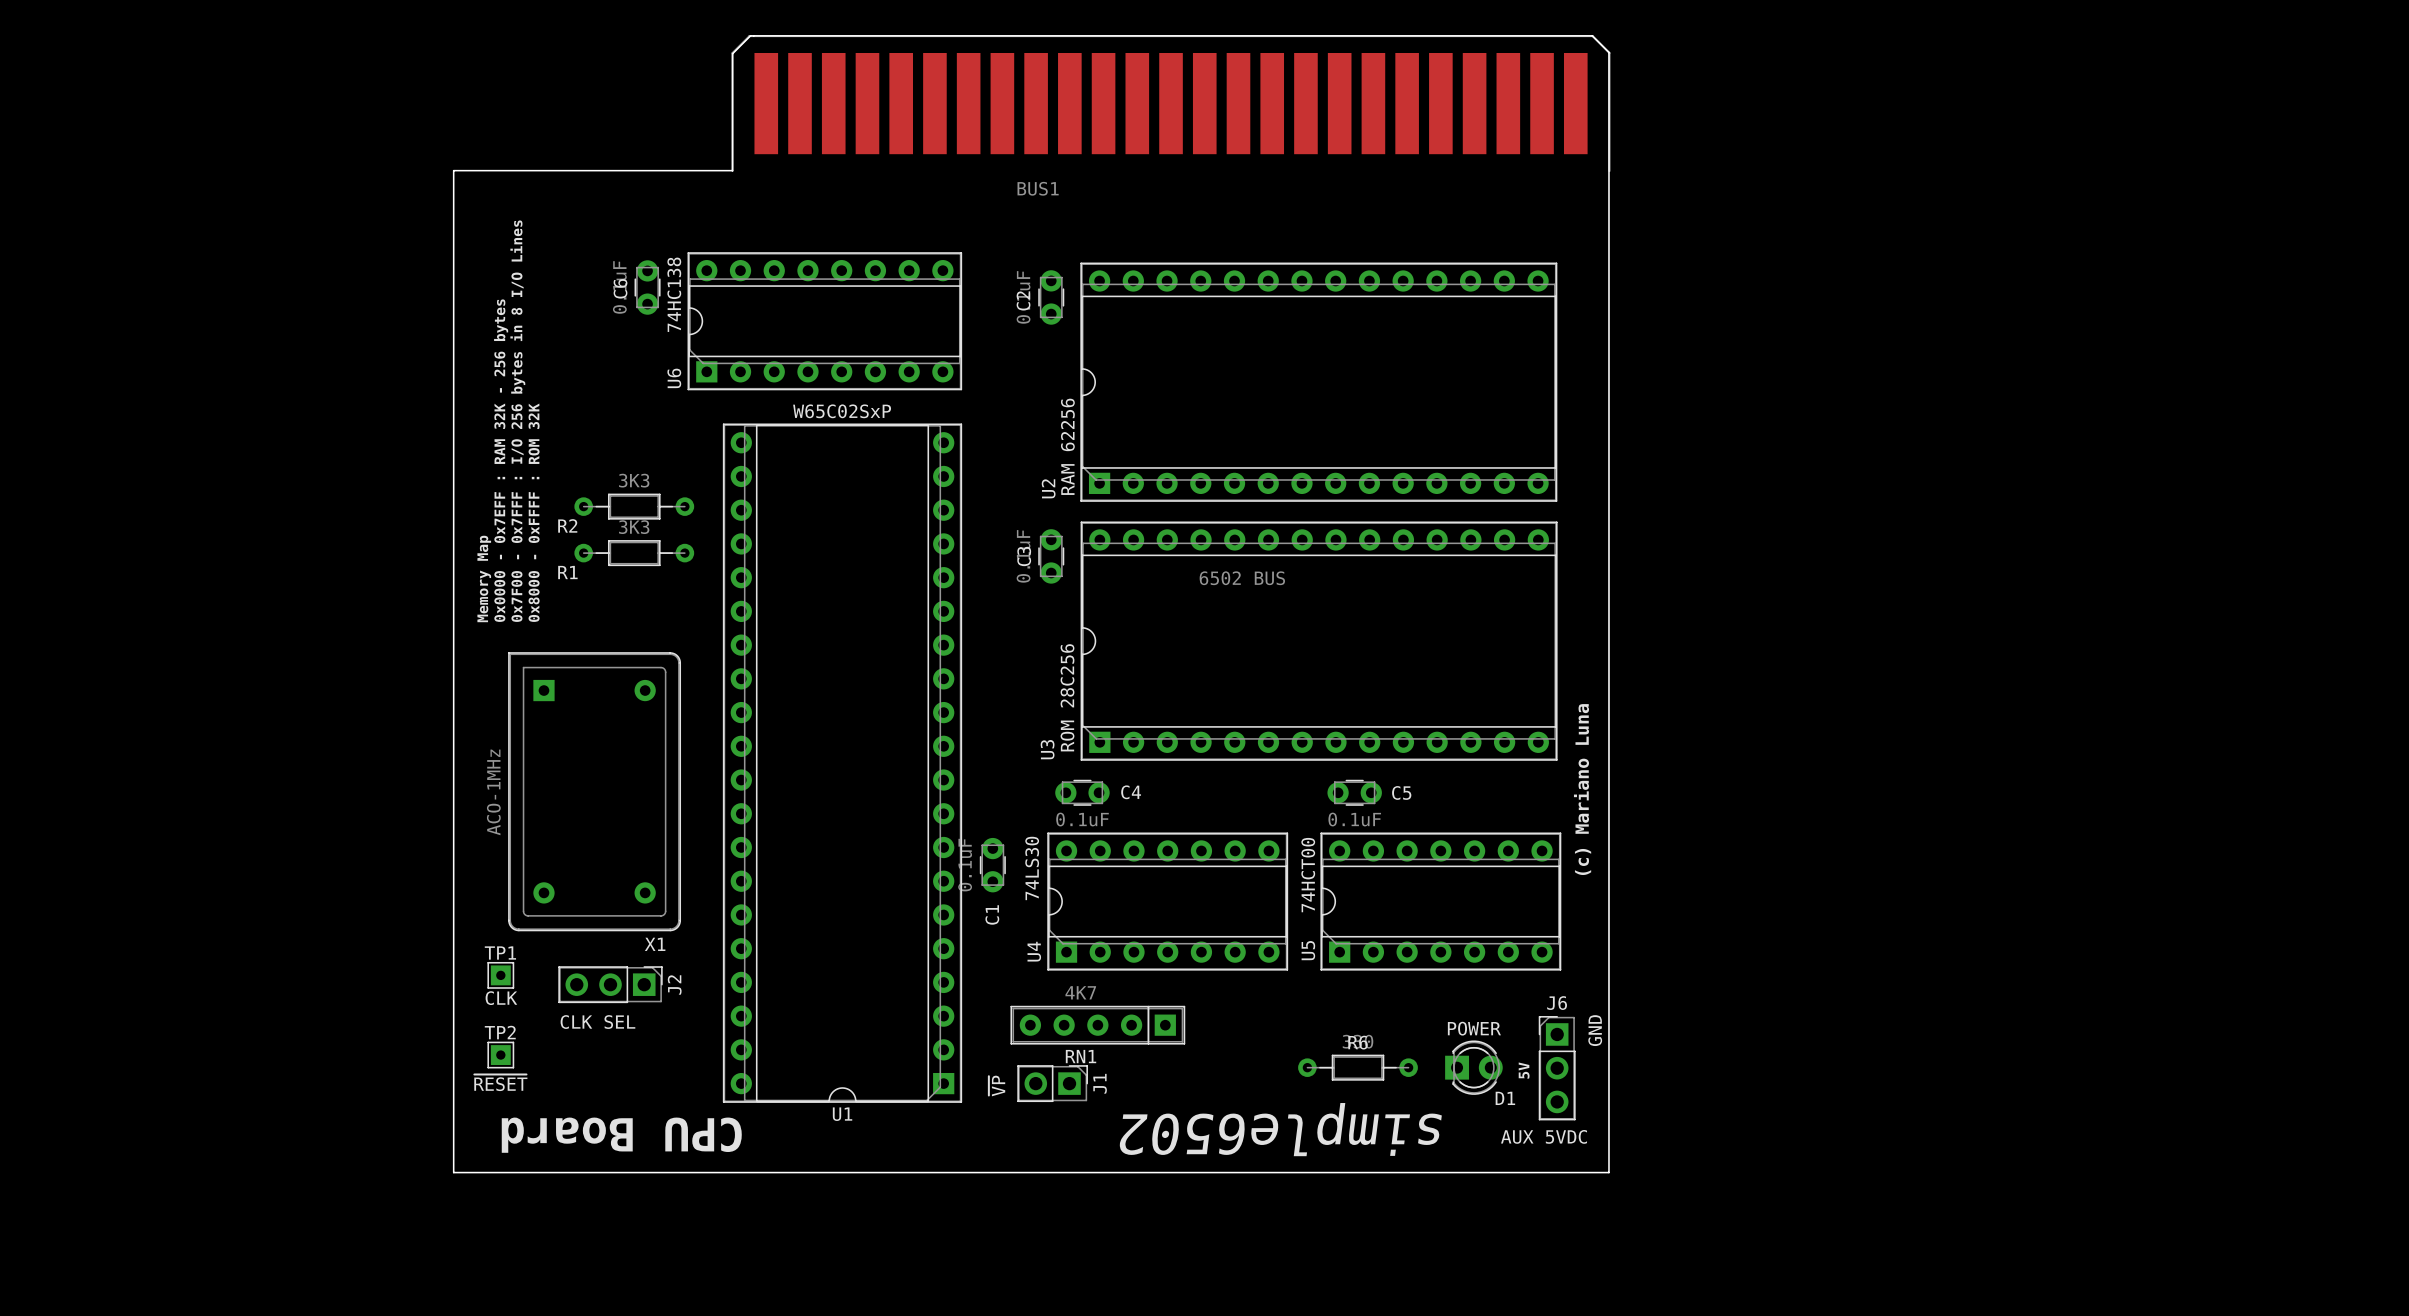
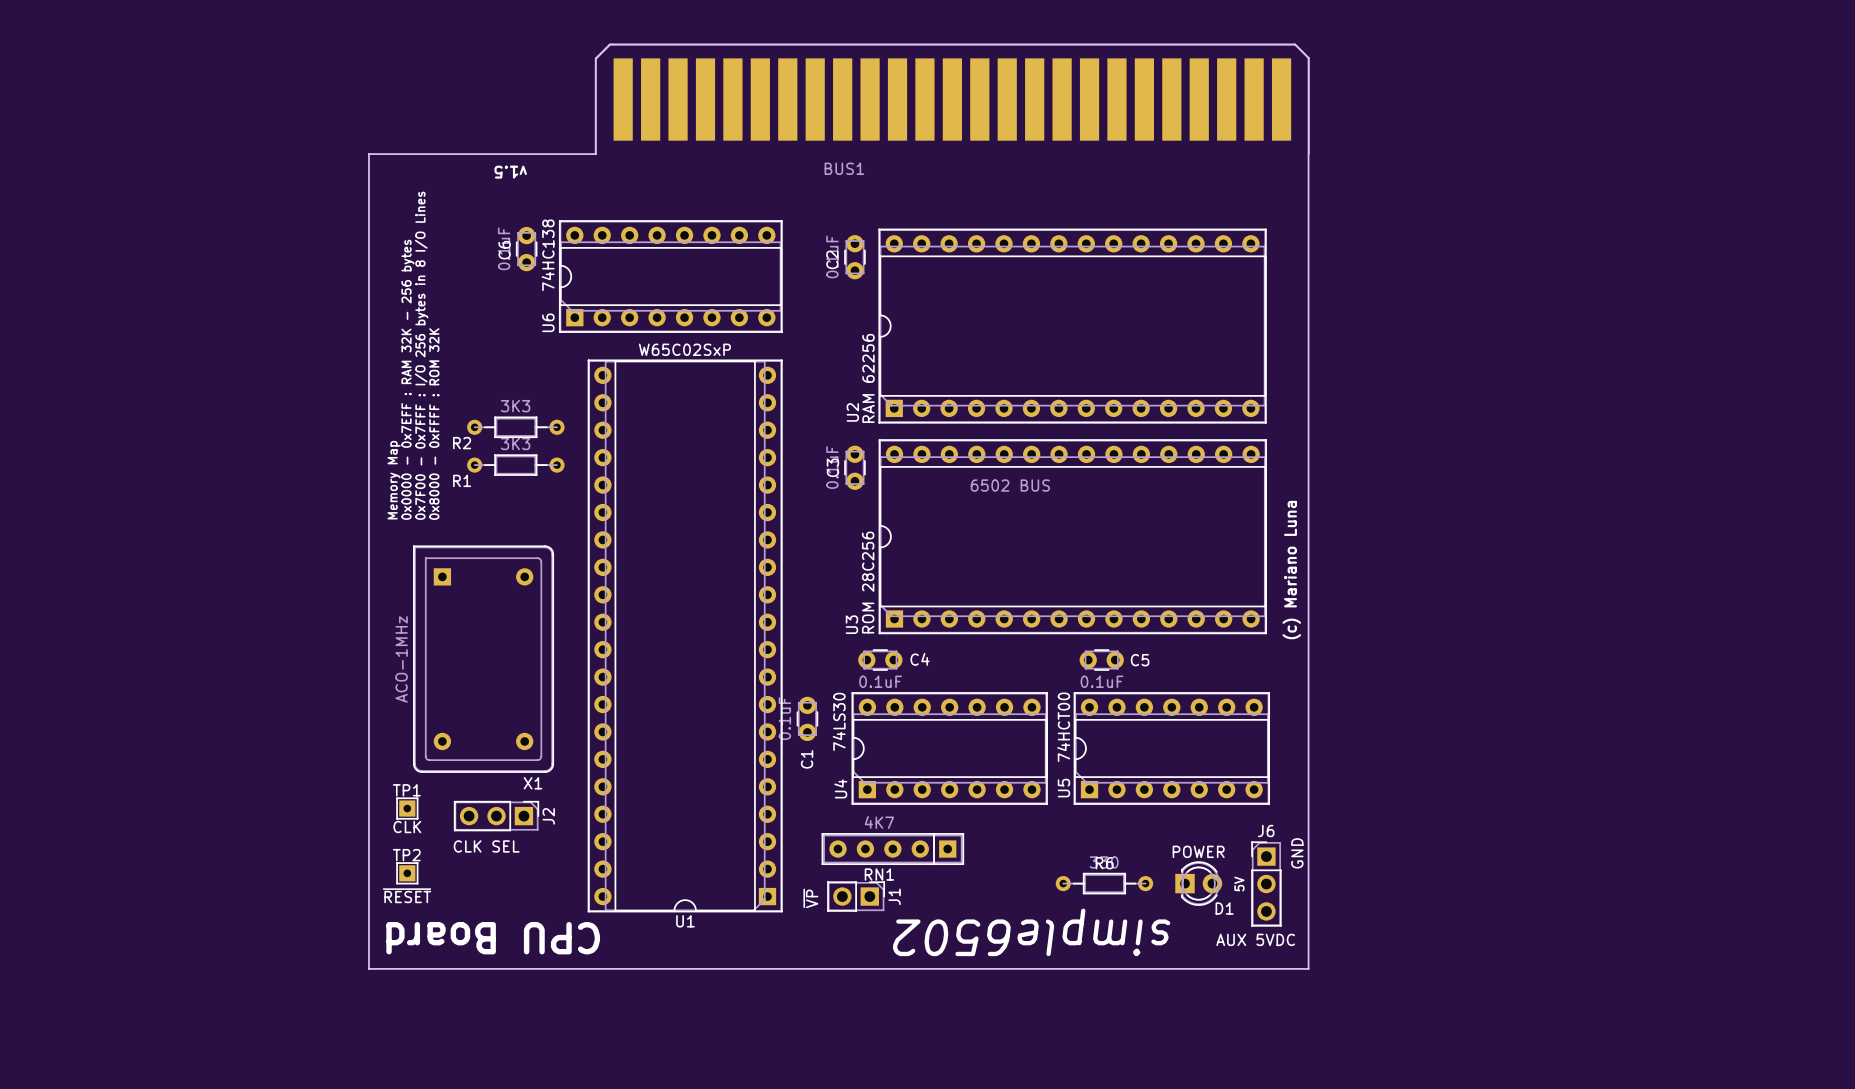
text: none -> v1.5 (510, 172)
text position: (c) Mariano Luna (1582, 789) -> (c) Mariano Luna (1291, 570)

